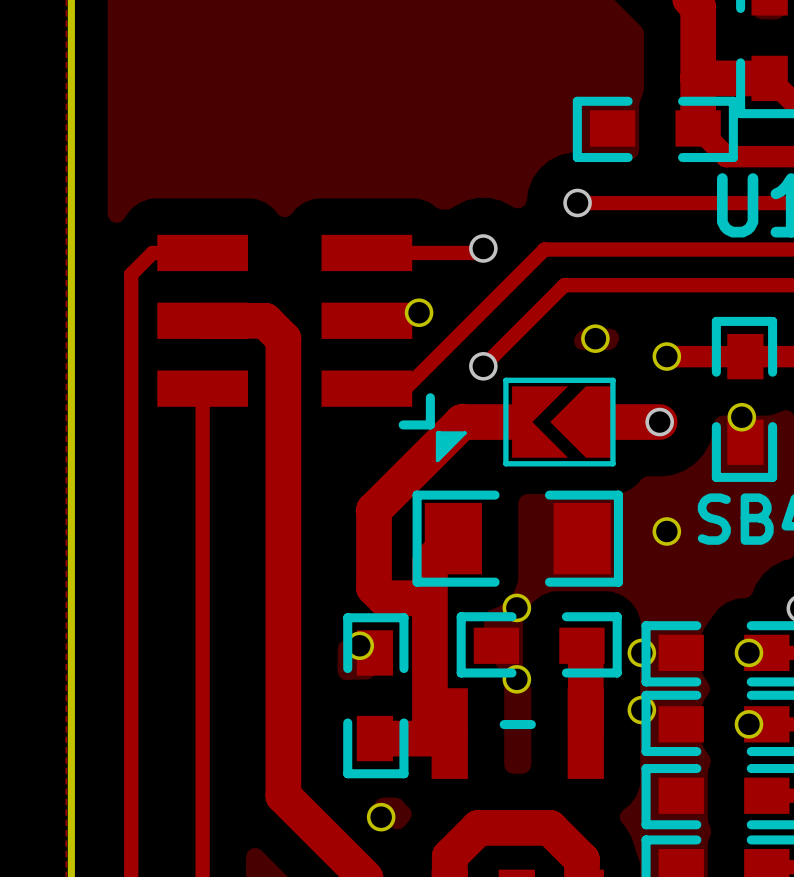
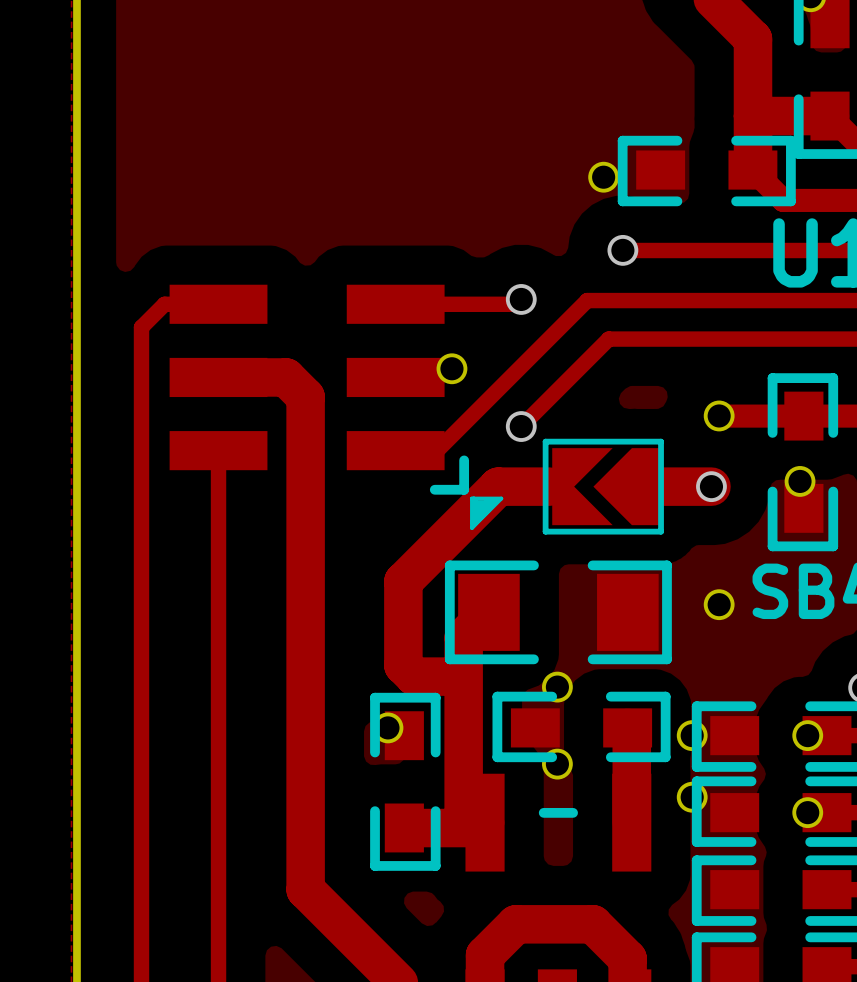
part position: (595, 338) -> (603, 177)
part: (381, 817) -> none

